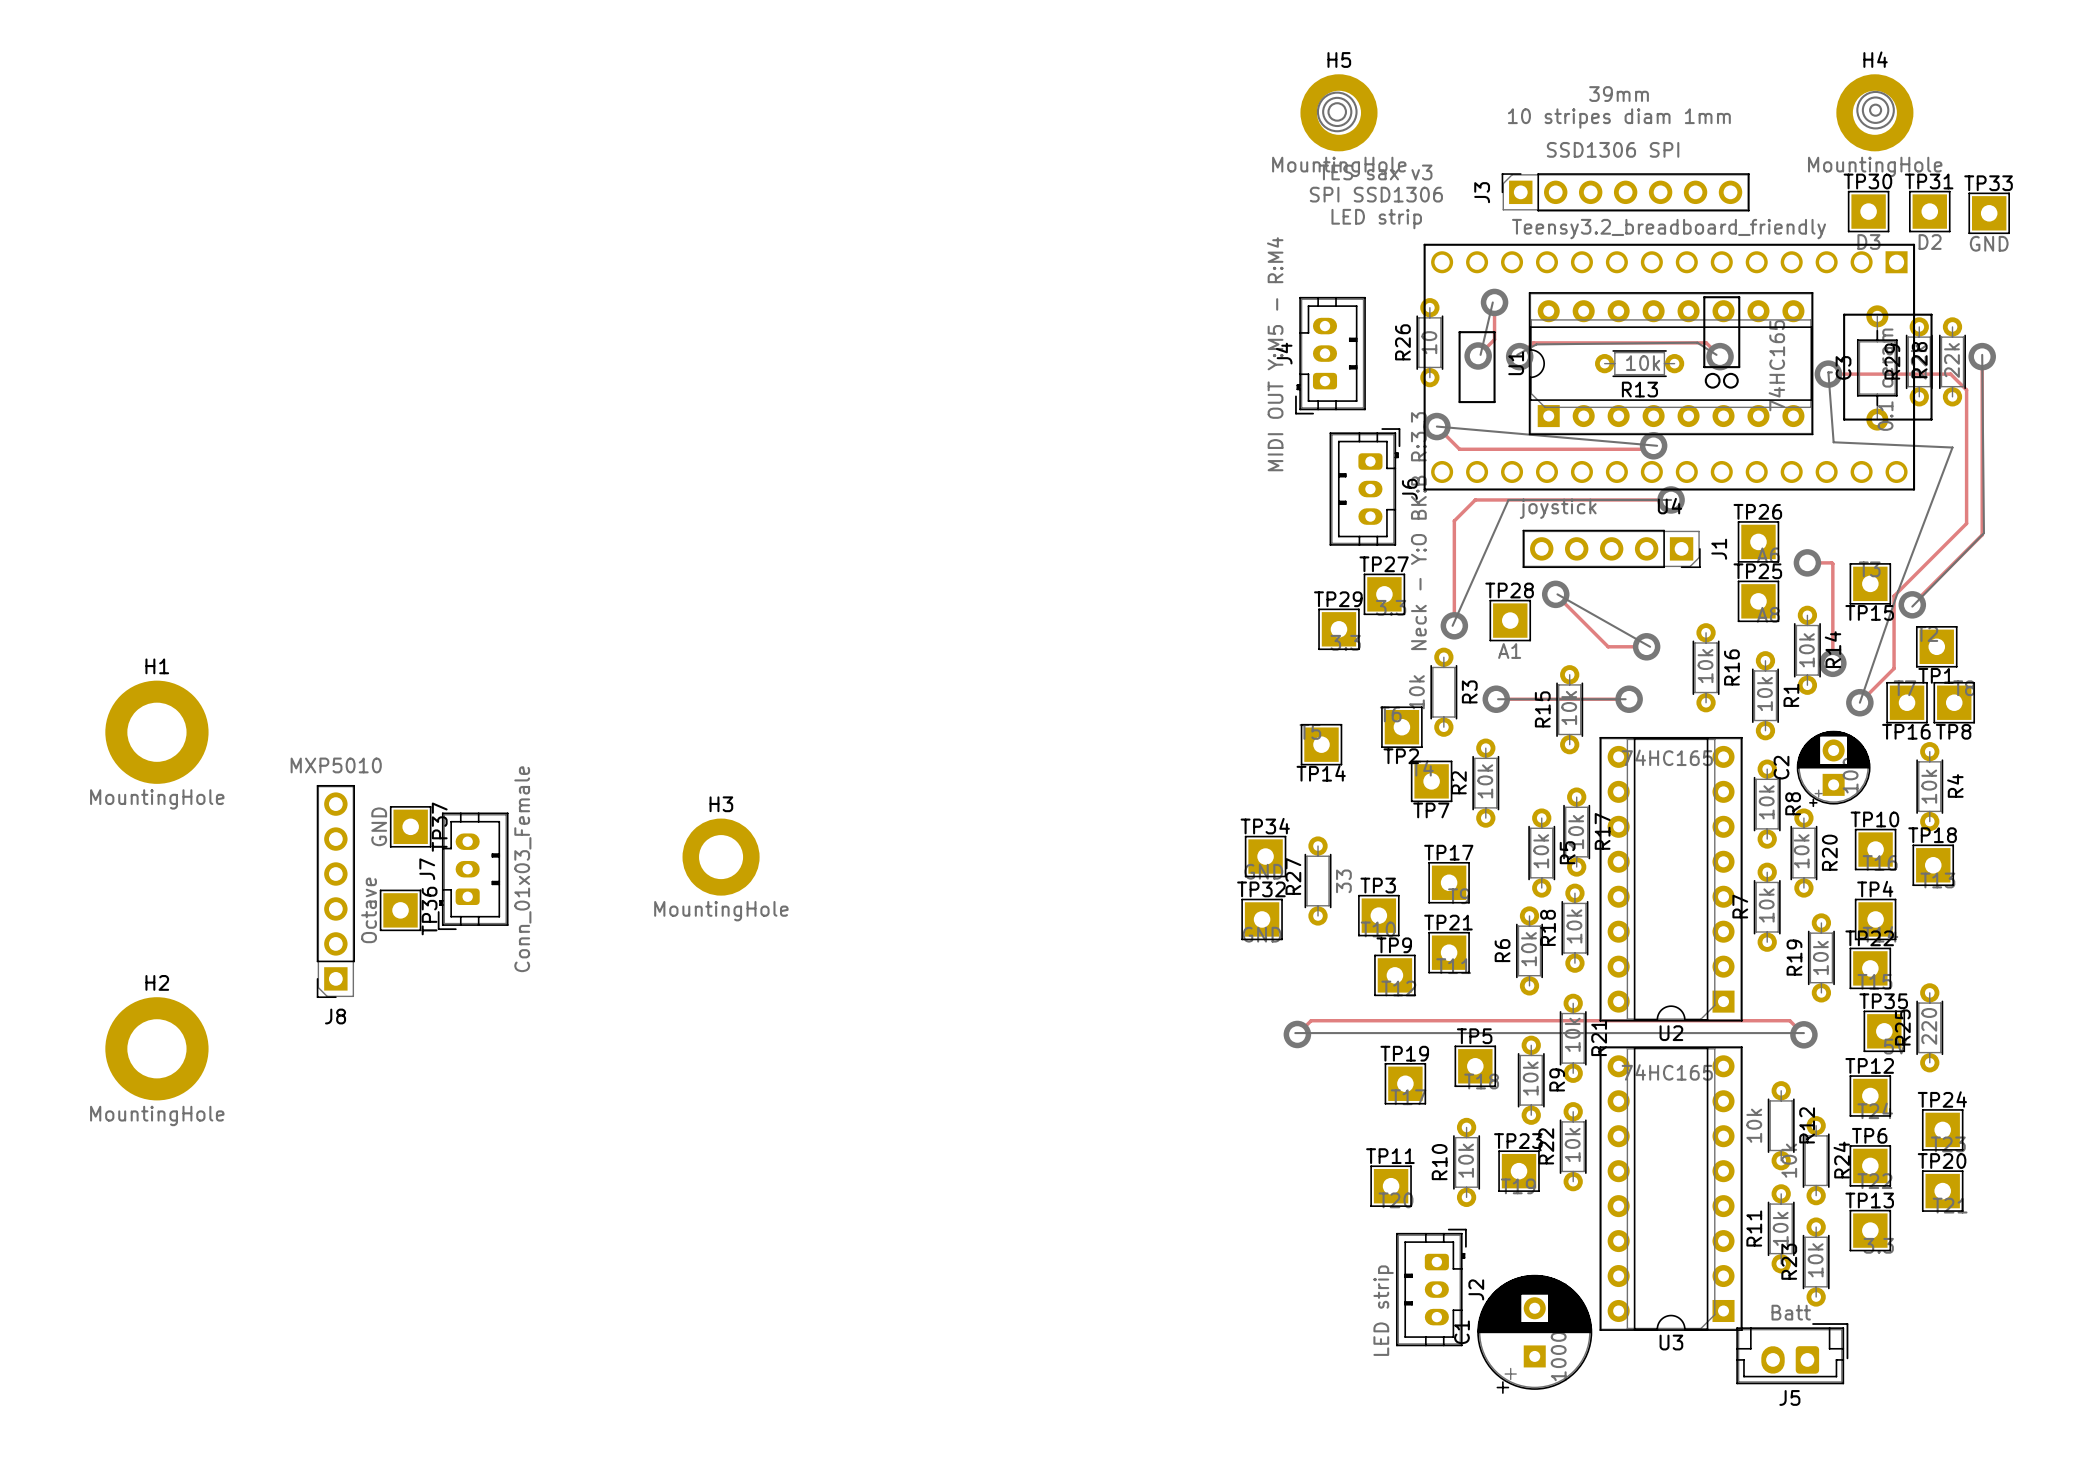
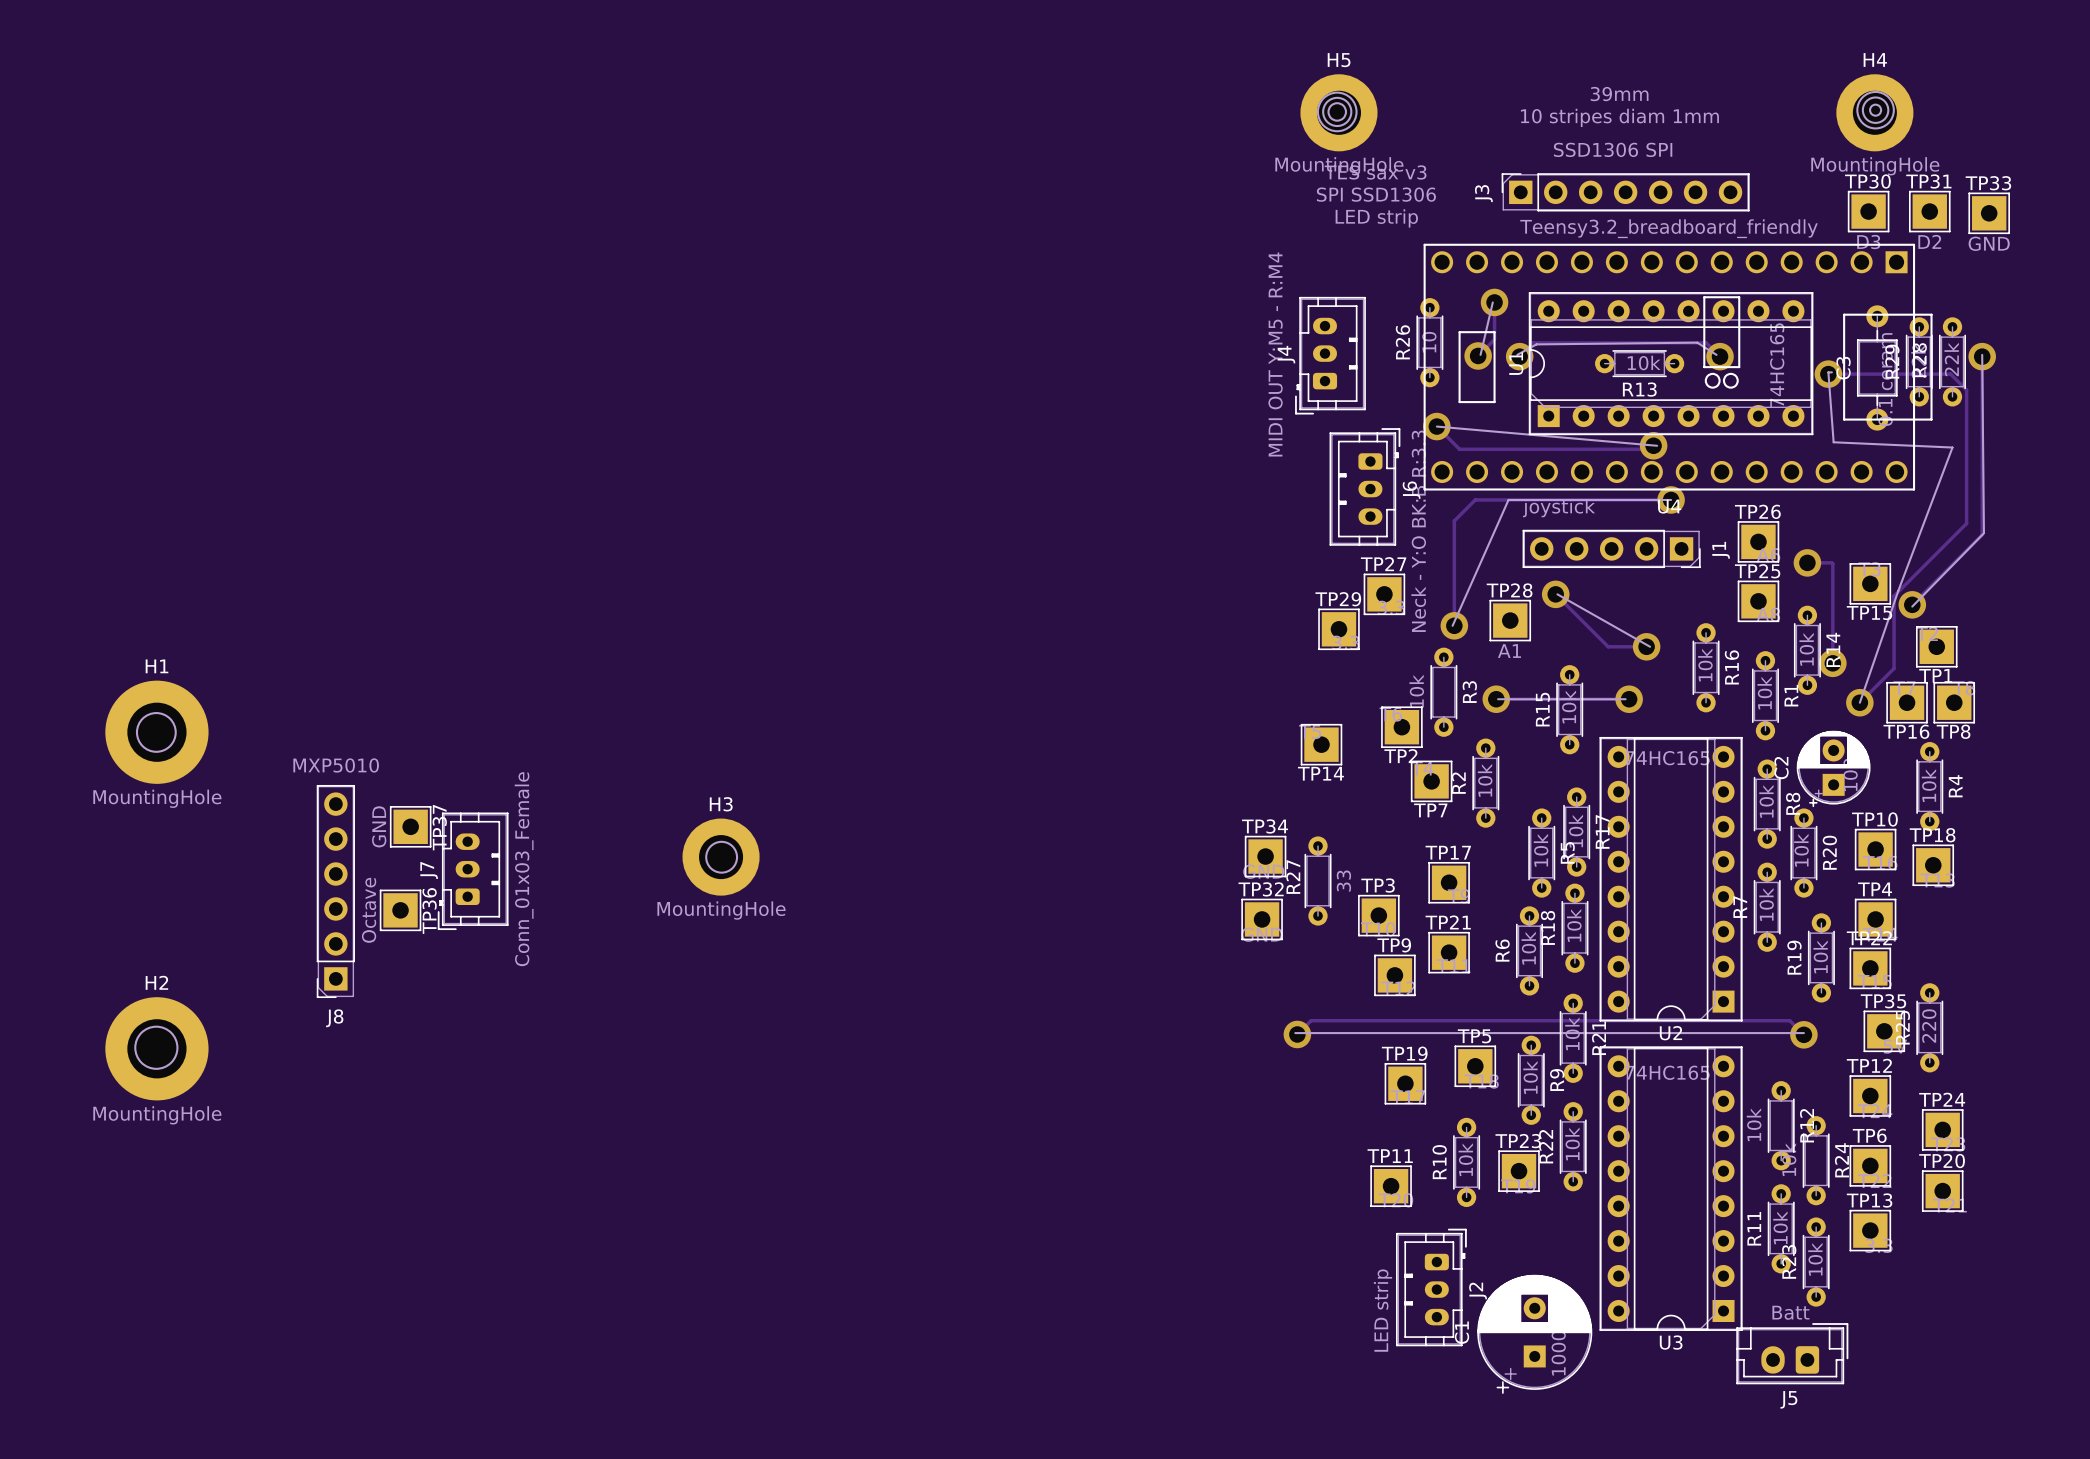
drawing: none -> [135, 712, 177, 753]
drawing: none -> [705, 840, 739, 874]
drawing: none -> [134, 1025, 179, 1070]

